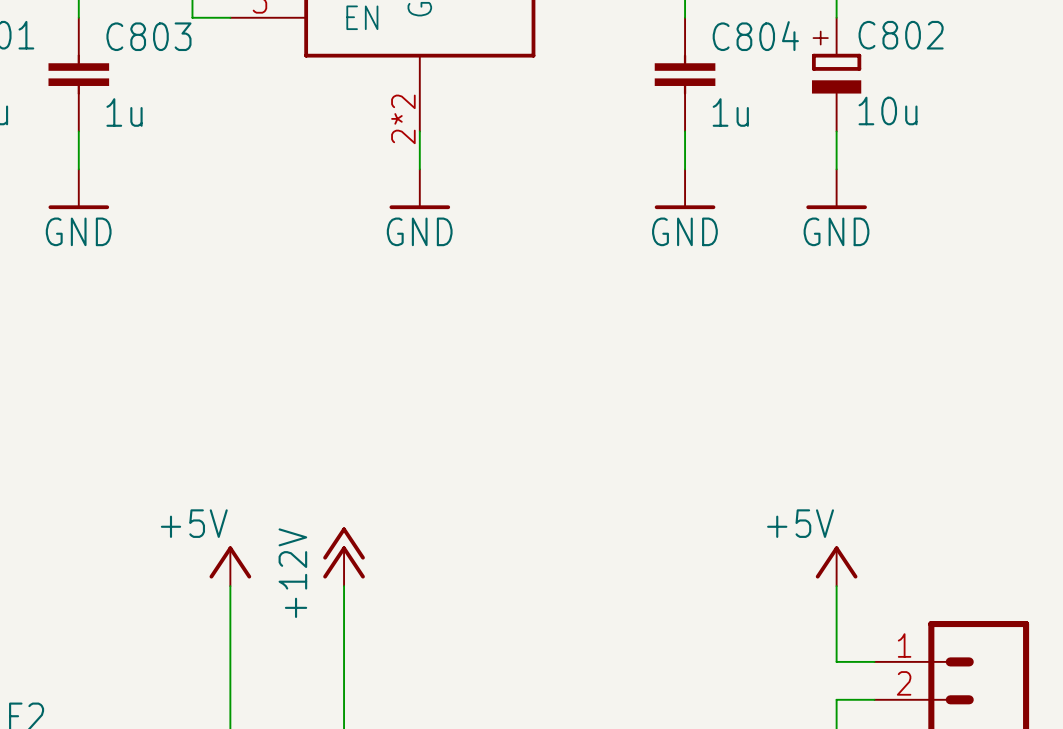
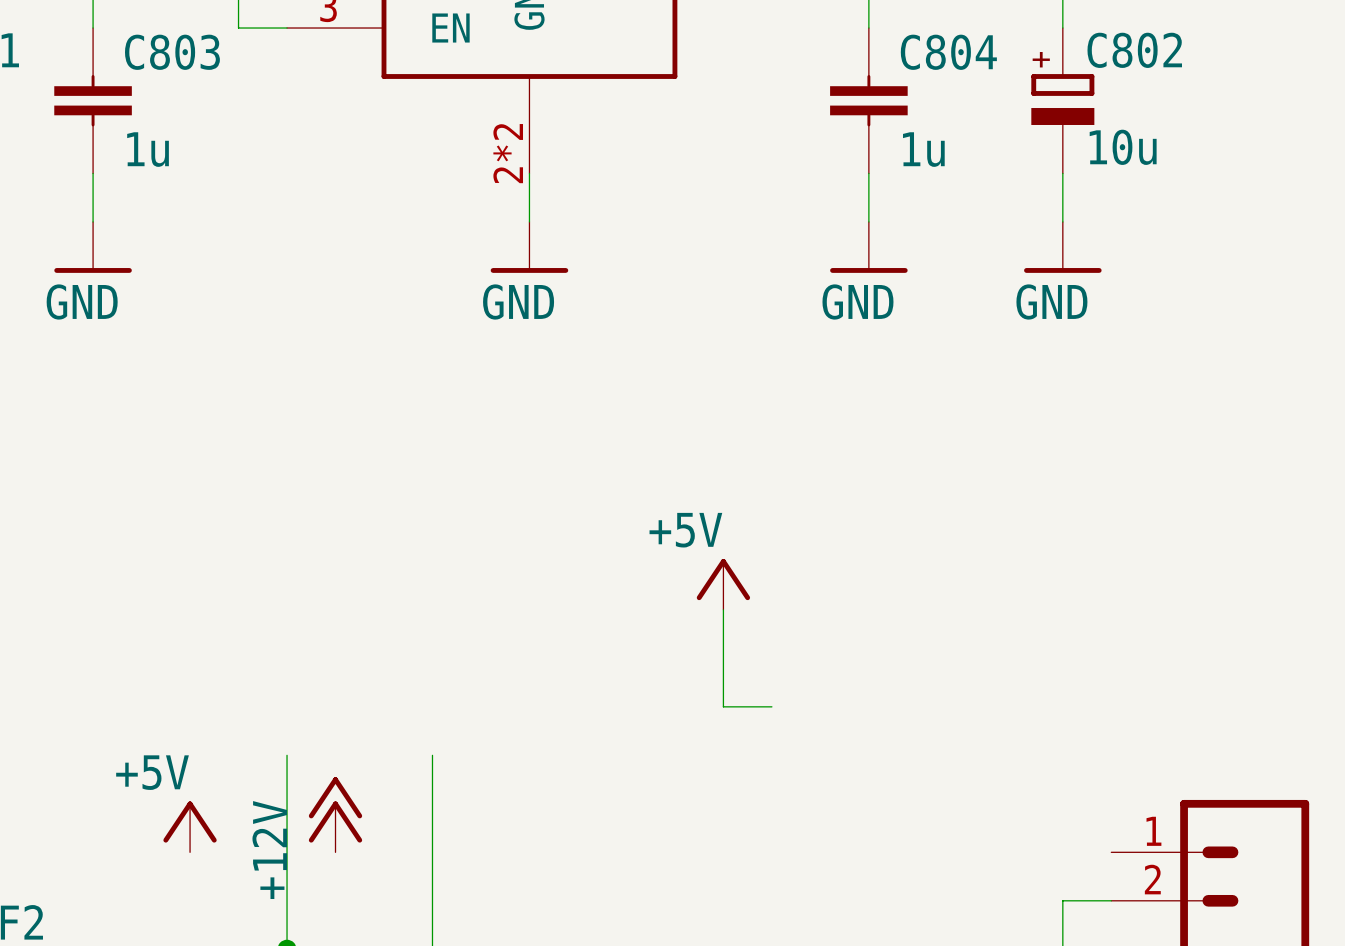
power symbol: none -> +5V (723, 584)
power symbol position: +12V (344, 556) -> +12V (335, 814)
power symbol position: +5V (230, 566) -> +5V (190, 826)
power symbol: +5V (836, 566) -> none
wire: (836, 586) (836, 661) (874, 661) -> (723, 609) (723, 706) (771, 706)

